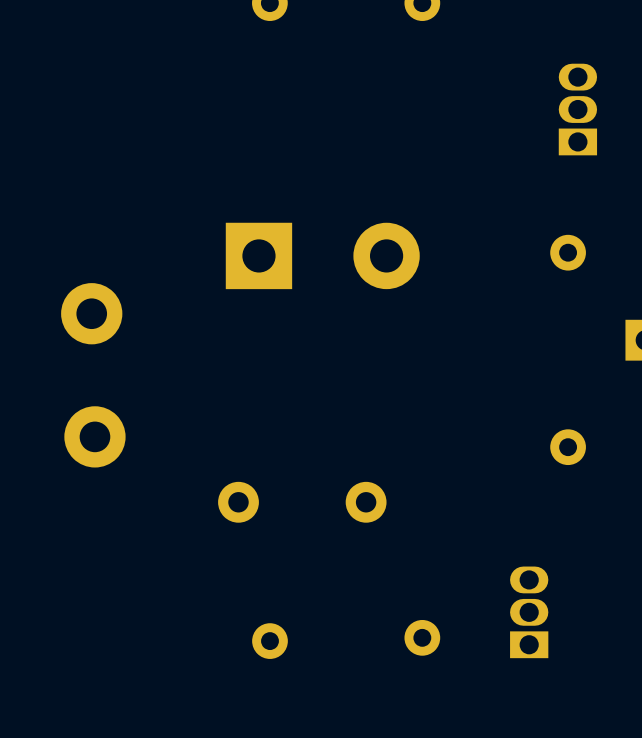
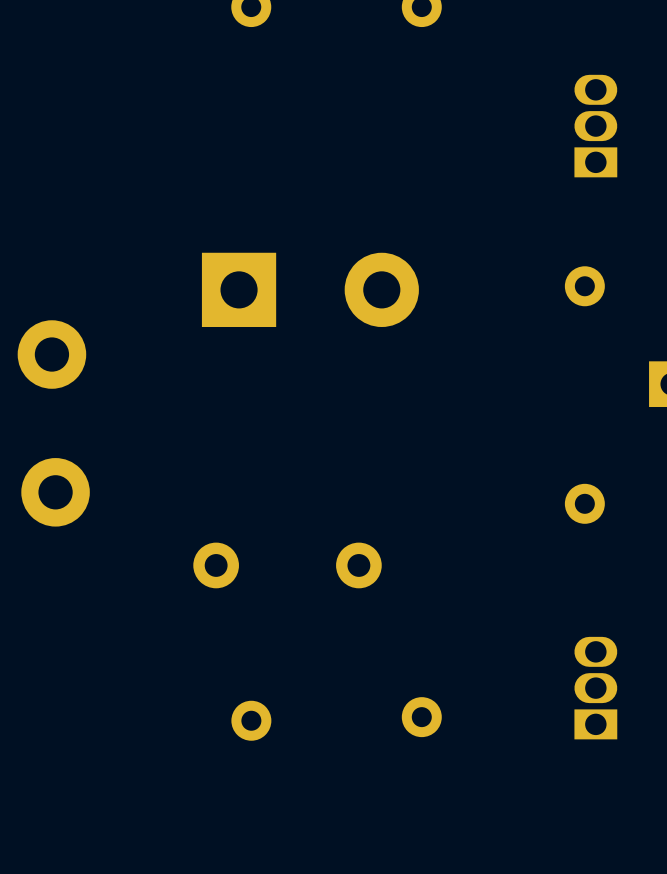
part position: (529, 612) -> (595, 688)

